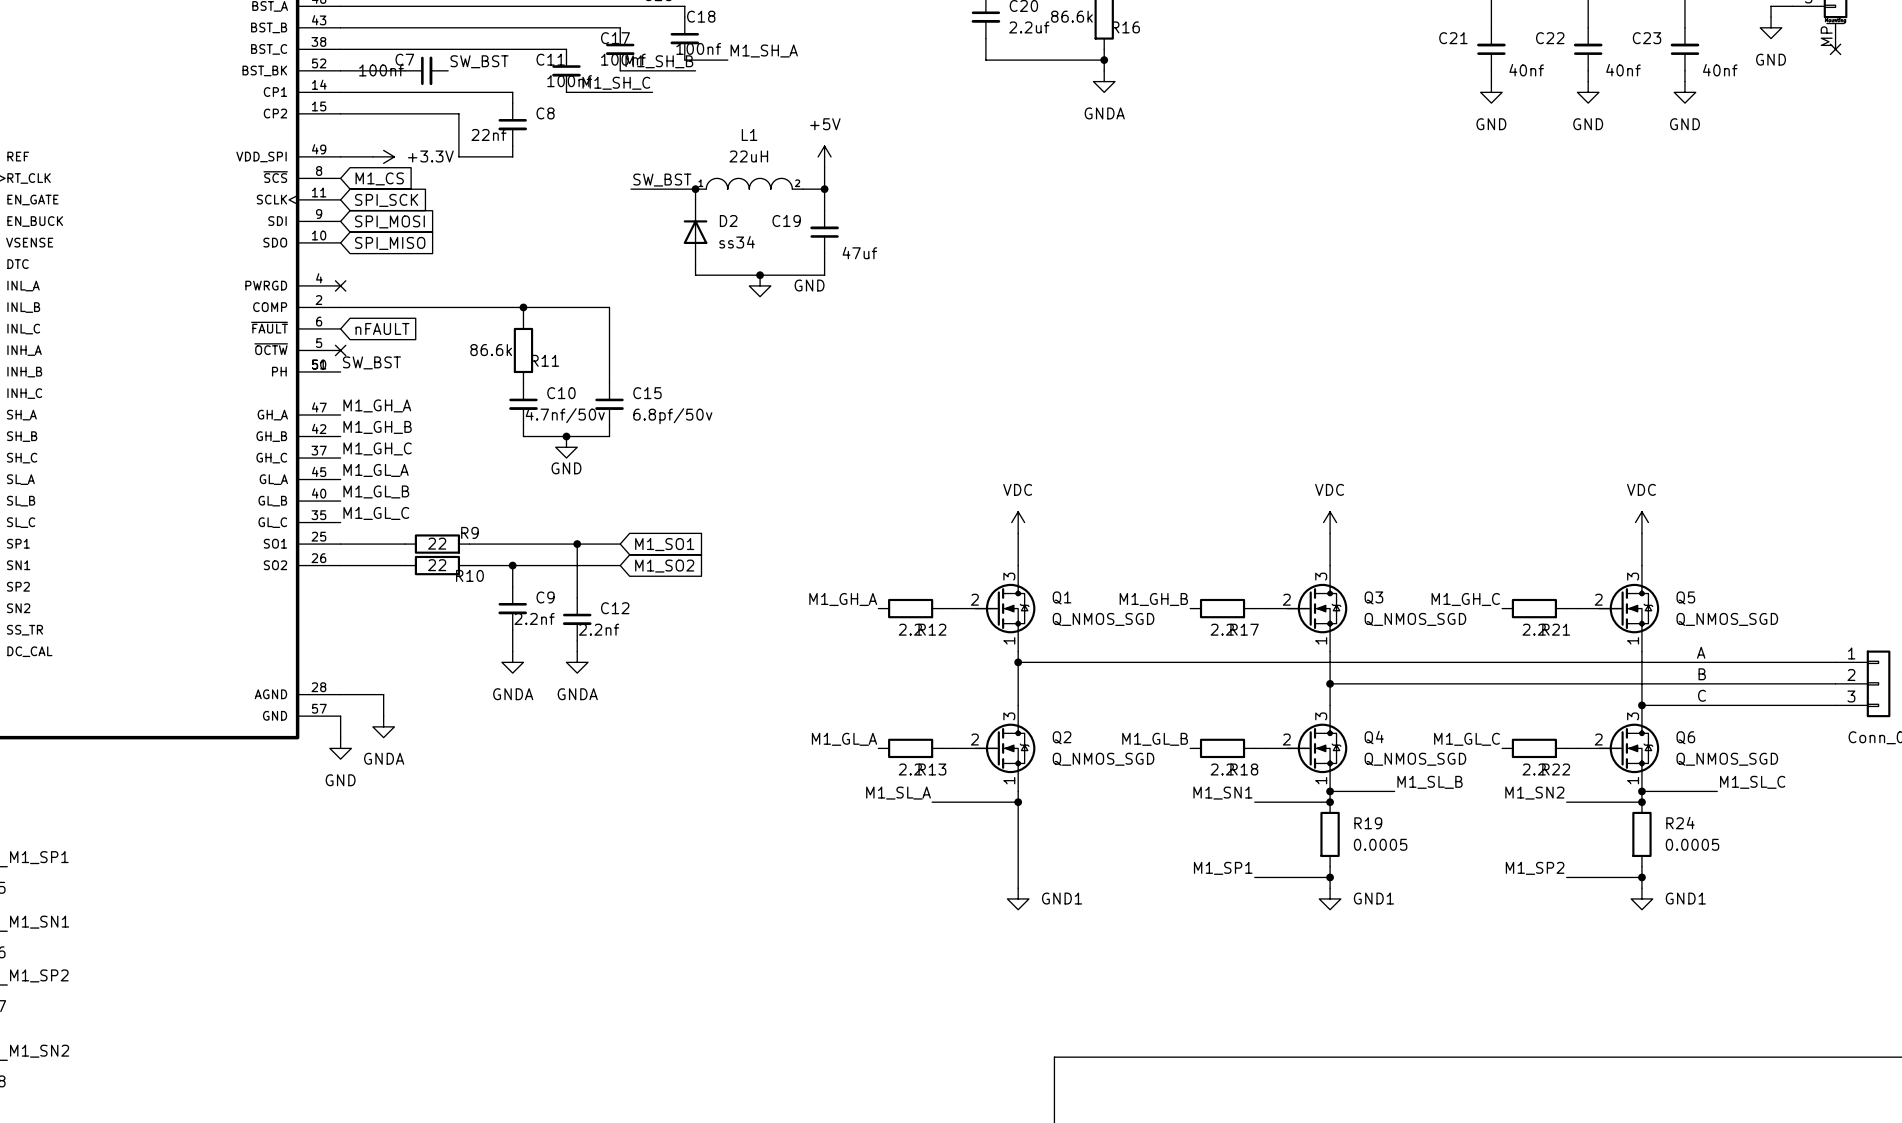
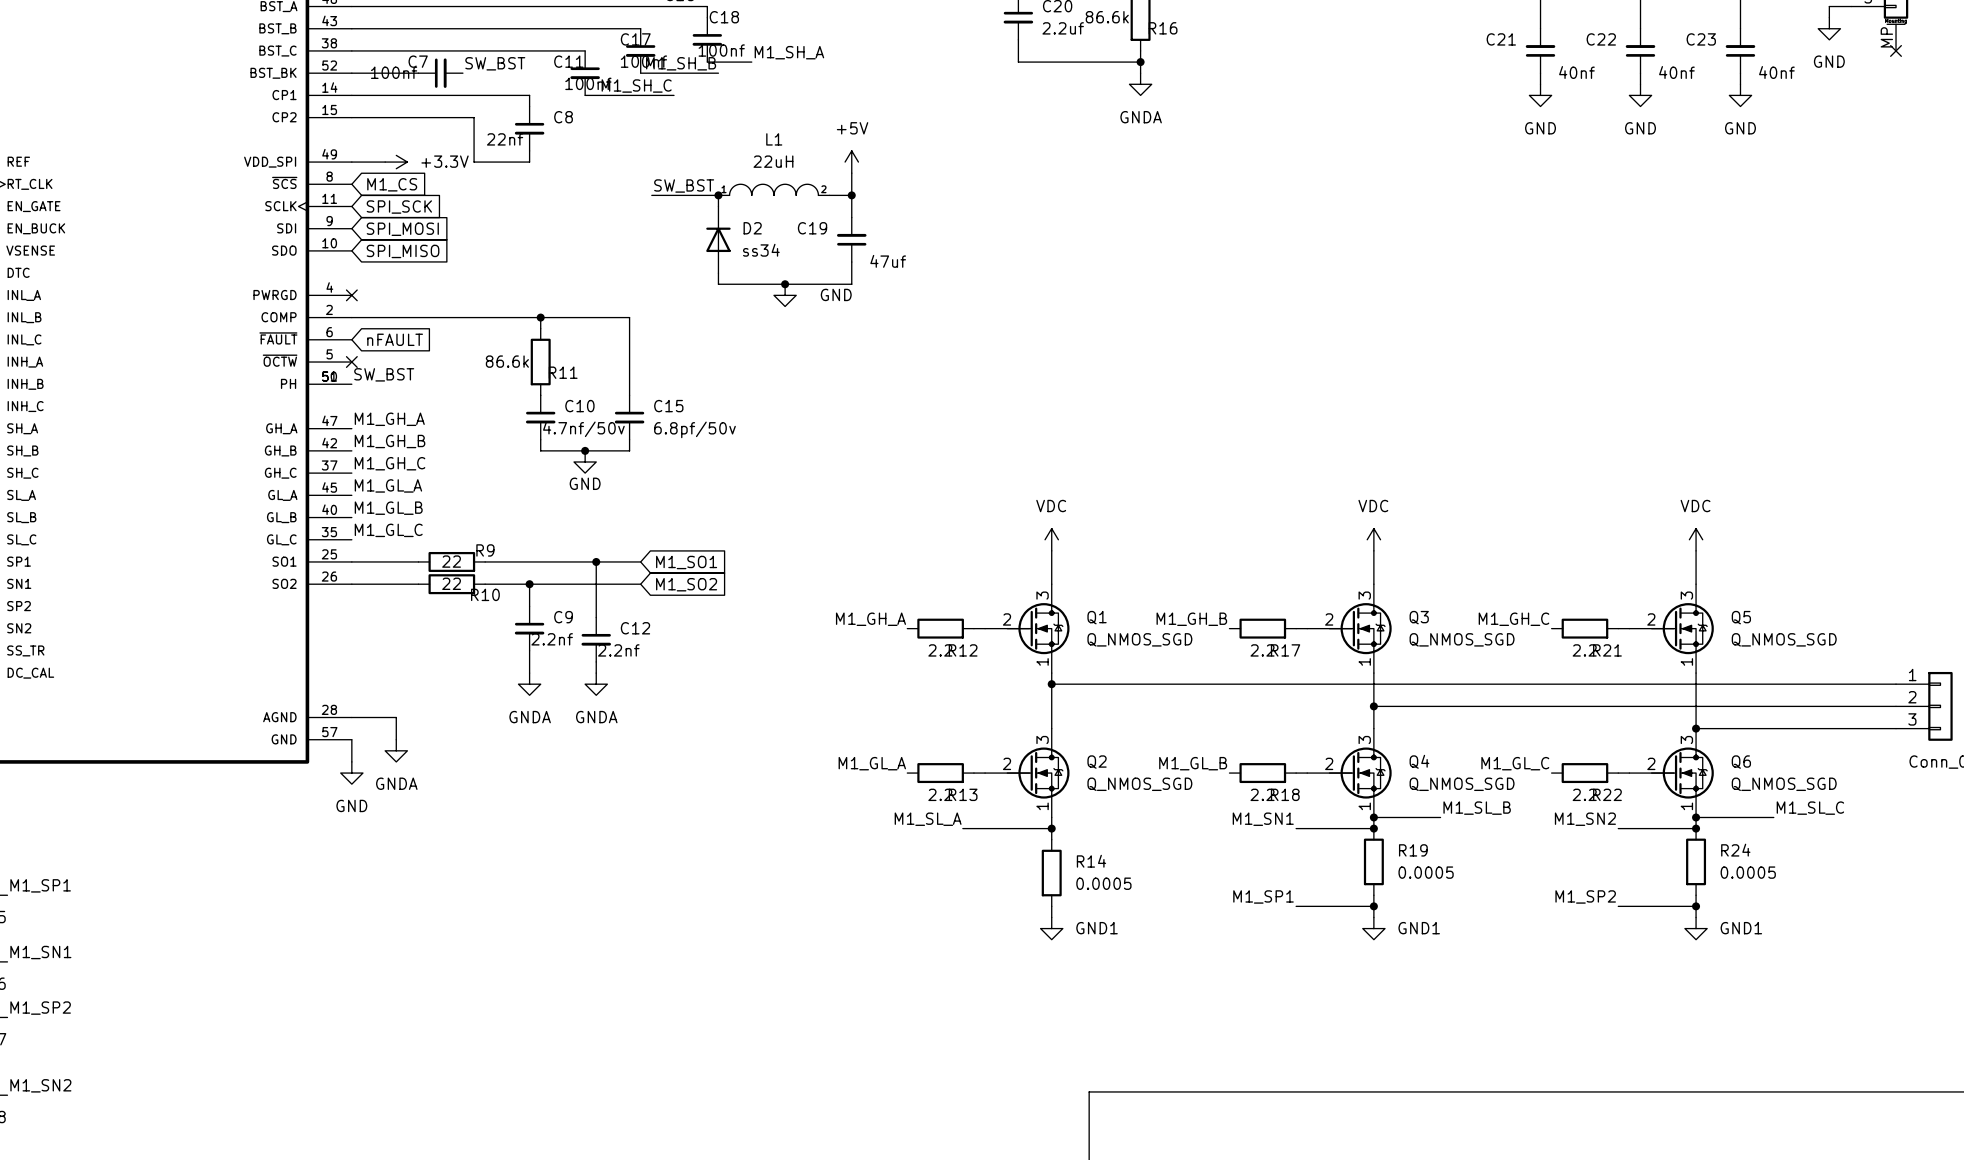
label: A (1701, 652) -> none
label: B (1702, 674) -> none
label: C (1701, 695) -> none
wire: (1018, 812) (1018, 877) -> none
R14: none -> 0.0005 (1051, 873)

